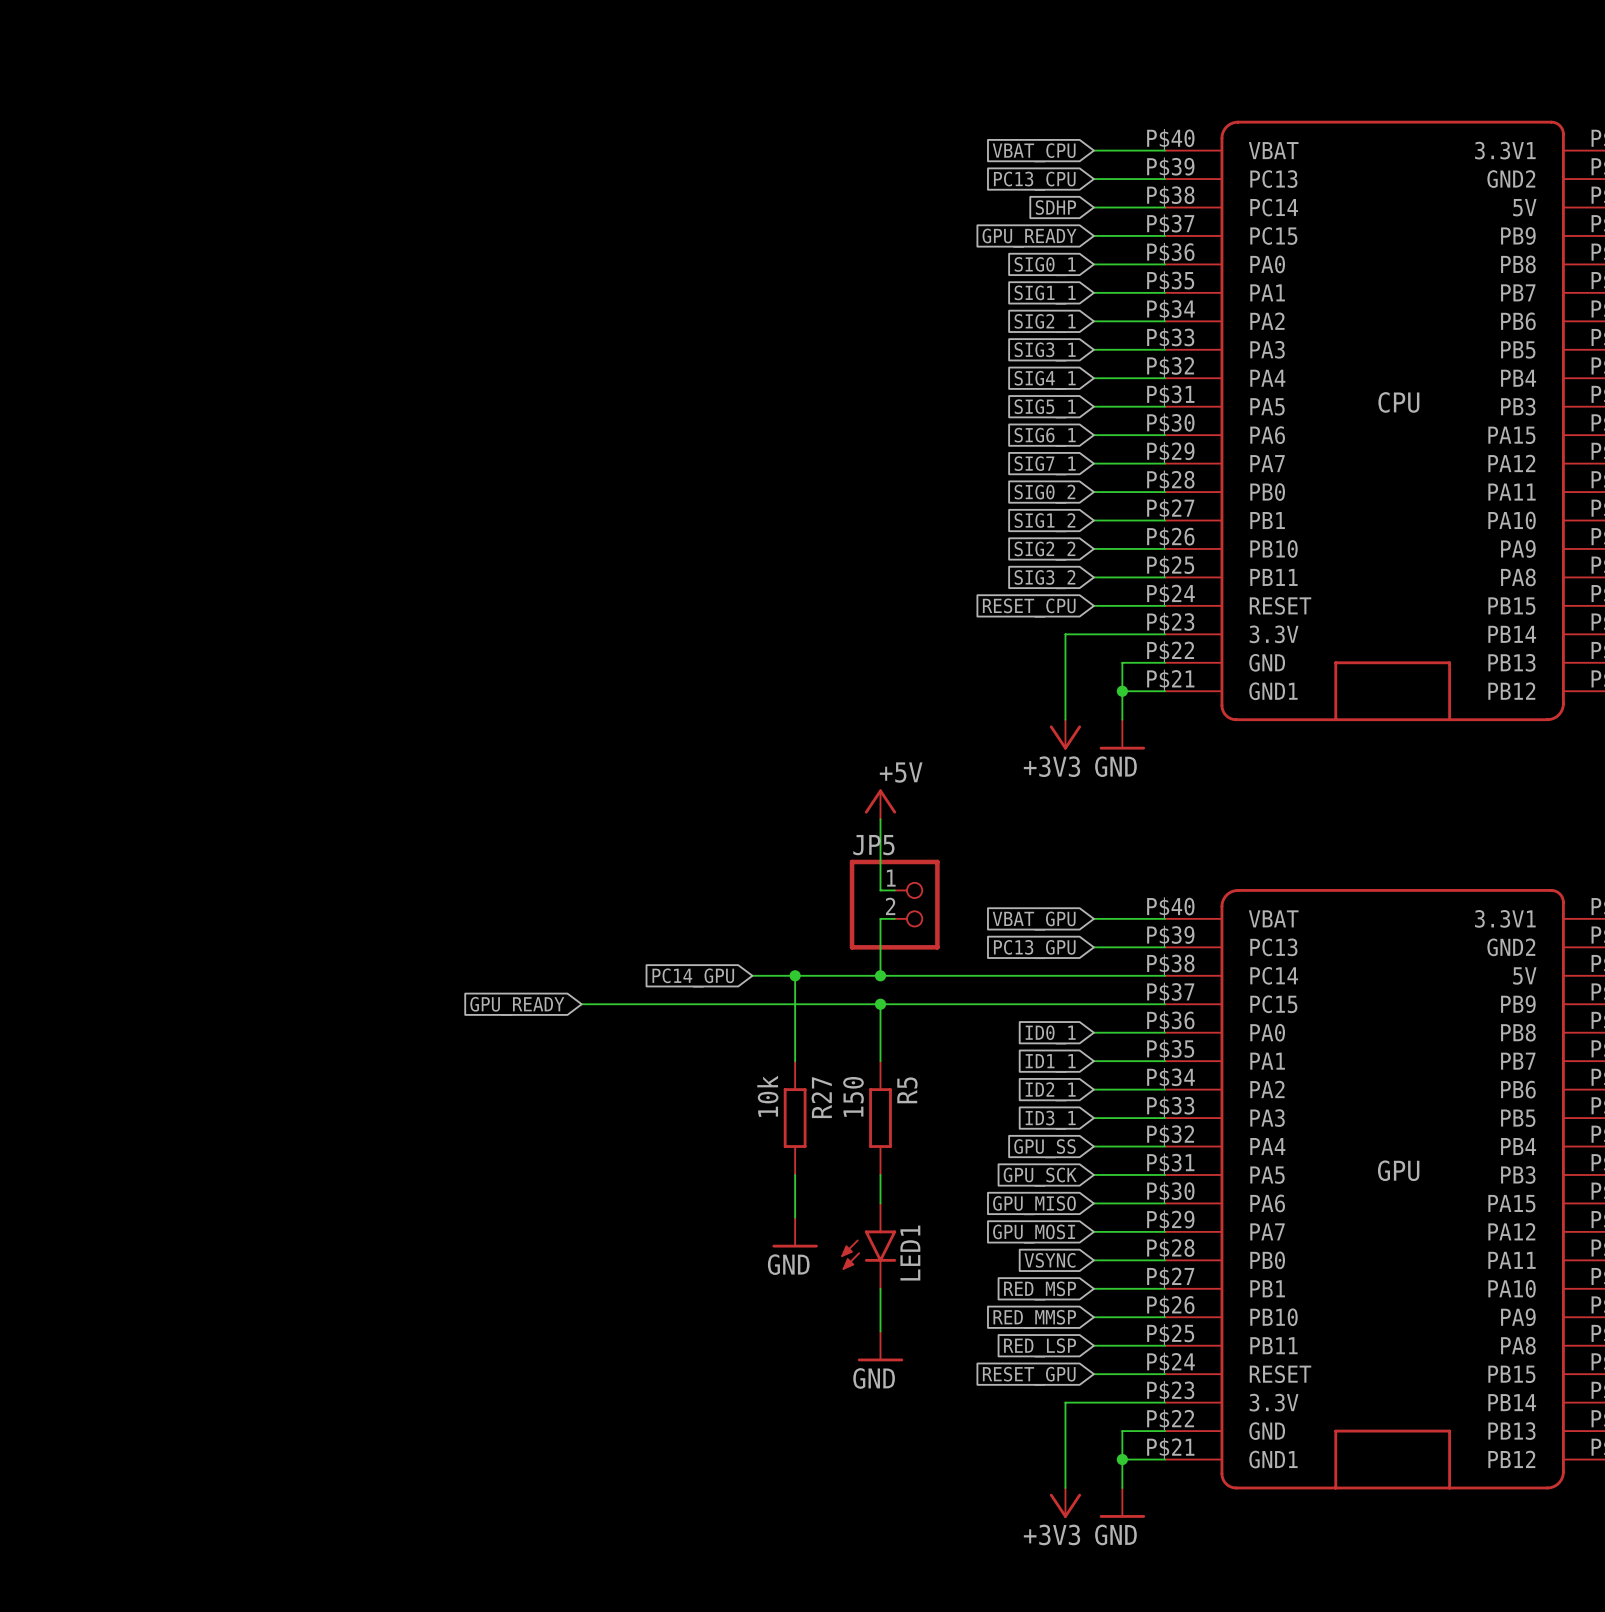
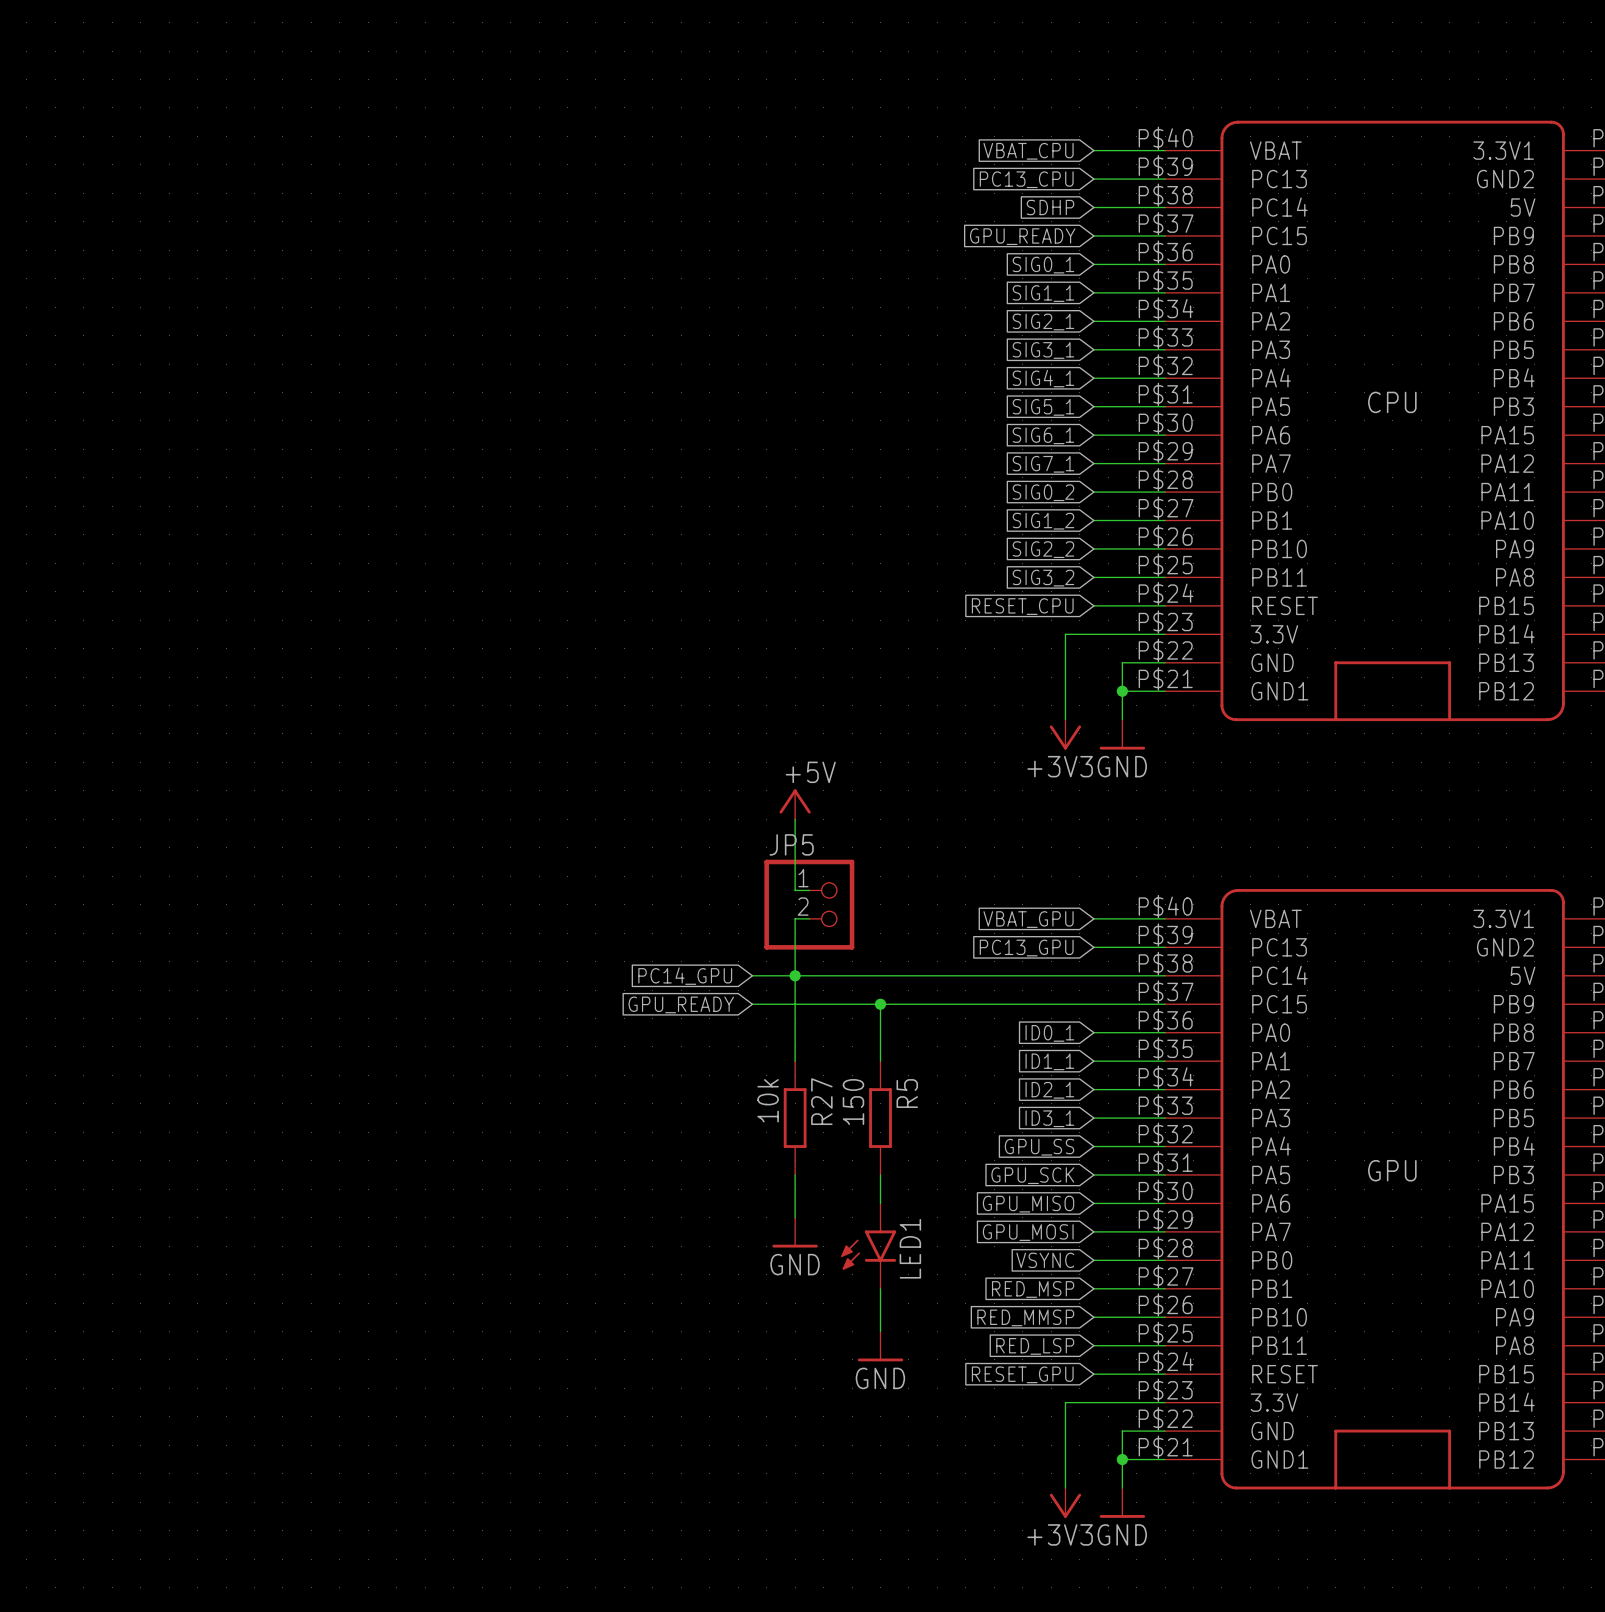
power symbol position: +5V (880, 804) -> +5V (795, 804)
wire: (880, 819) (880, 890) (894, 890) -> (795, 819) (795, 890) (809, 890)
JP5 position: (894, 904) -> (809, 904)
wire: (894, 918) (880, 918) (880, 975) -> (809, 918) (795, 918) (795, 975)
junction: (880, 975) -> none
wire: (581, 1004) (752, 1004) -> none
global label position: GPU_READY (517, 1006) -> GPU_READY (681, 1004)

